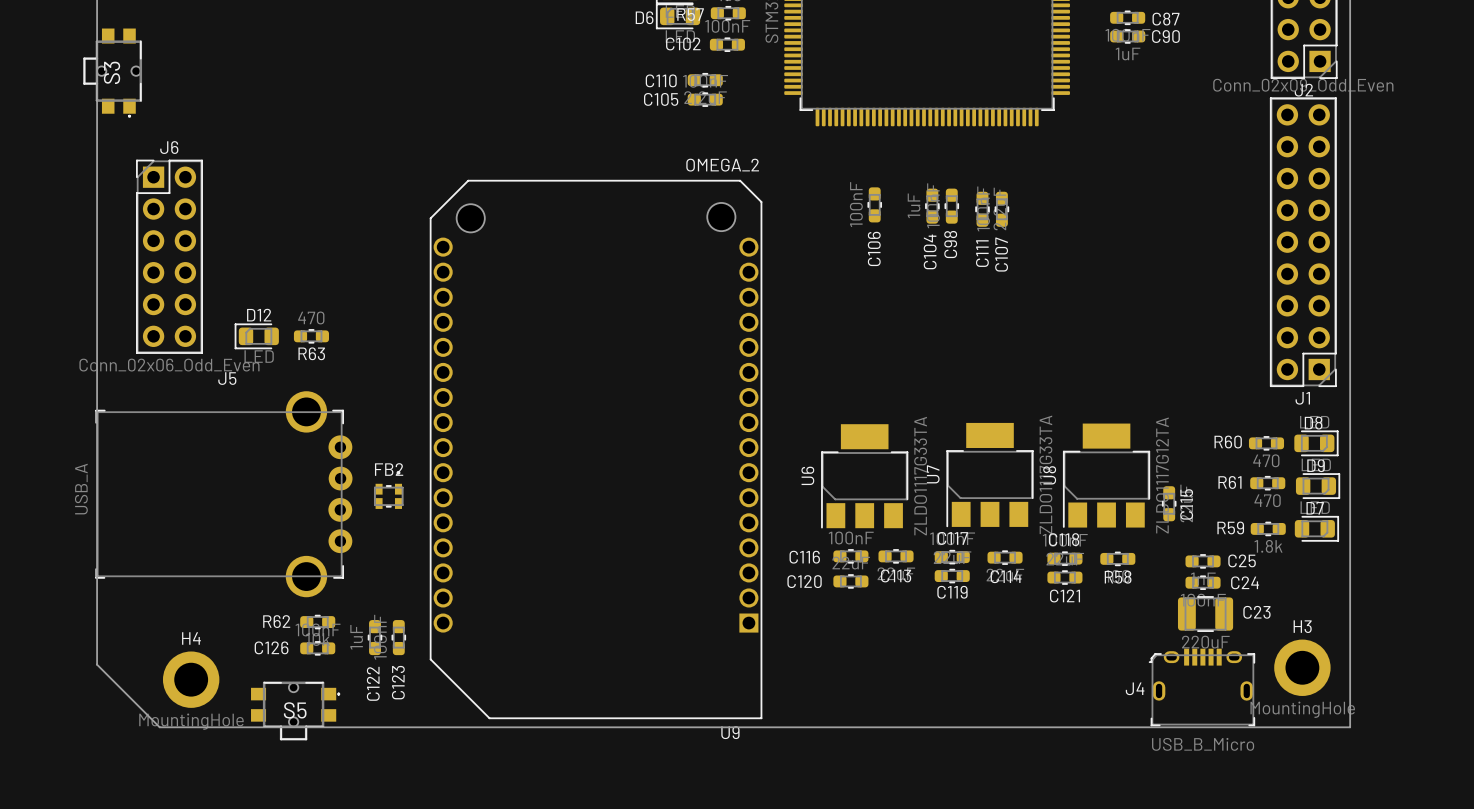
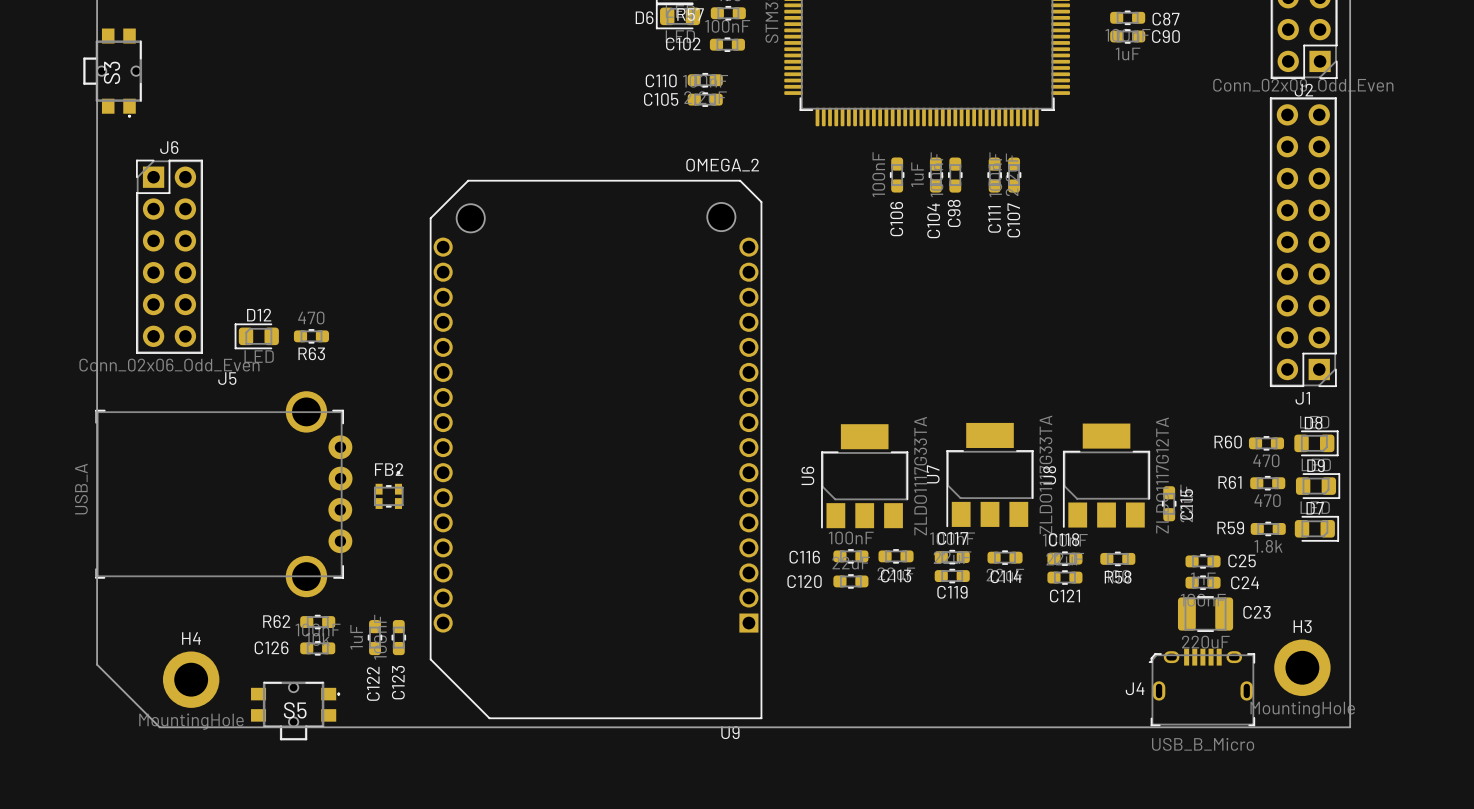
C106 position: (874, 204) -> (897, 175)
C104 position: (932, 206) -> (935, 175)
C98 position: (951, 206) -> (955, 175)
C111 position: (982, 209) -> (994, 175)
C107 position: (1001, 209) -> (1014, 175)

